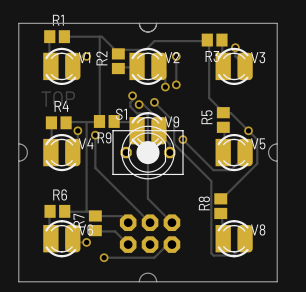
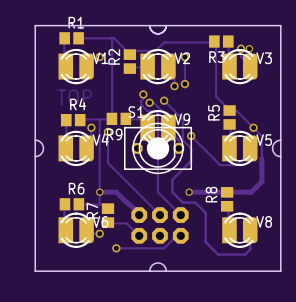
via: none -> (249, 48)
track: (182, 152) (211, 181) (211, 253) (213, 255) (233, 255) (244, 244) (245, 238) -> (191, 148) (191, 161) (172, 179) (172, 192) (182, 202) (195, 202) (205, 212) (205, 242) (218, 254) (245, 254) (250, 249) (250, 230)
track: (257, 163) (222, 198) -> (261, 158) (261, 181) (251, 192) (189, 192)
via: none -> (99, 192)
via: none -> (189, 192)
track: (95, 216) (121, 216) (128, 222) -> (99, 192) (116, 192) (139, 215)

